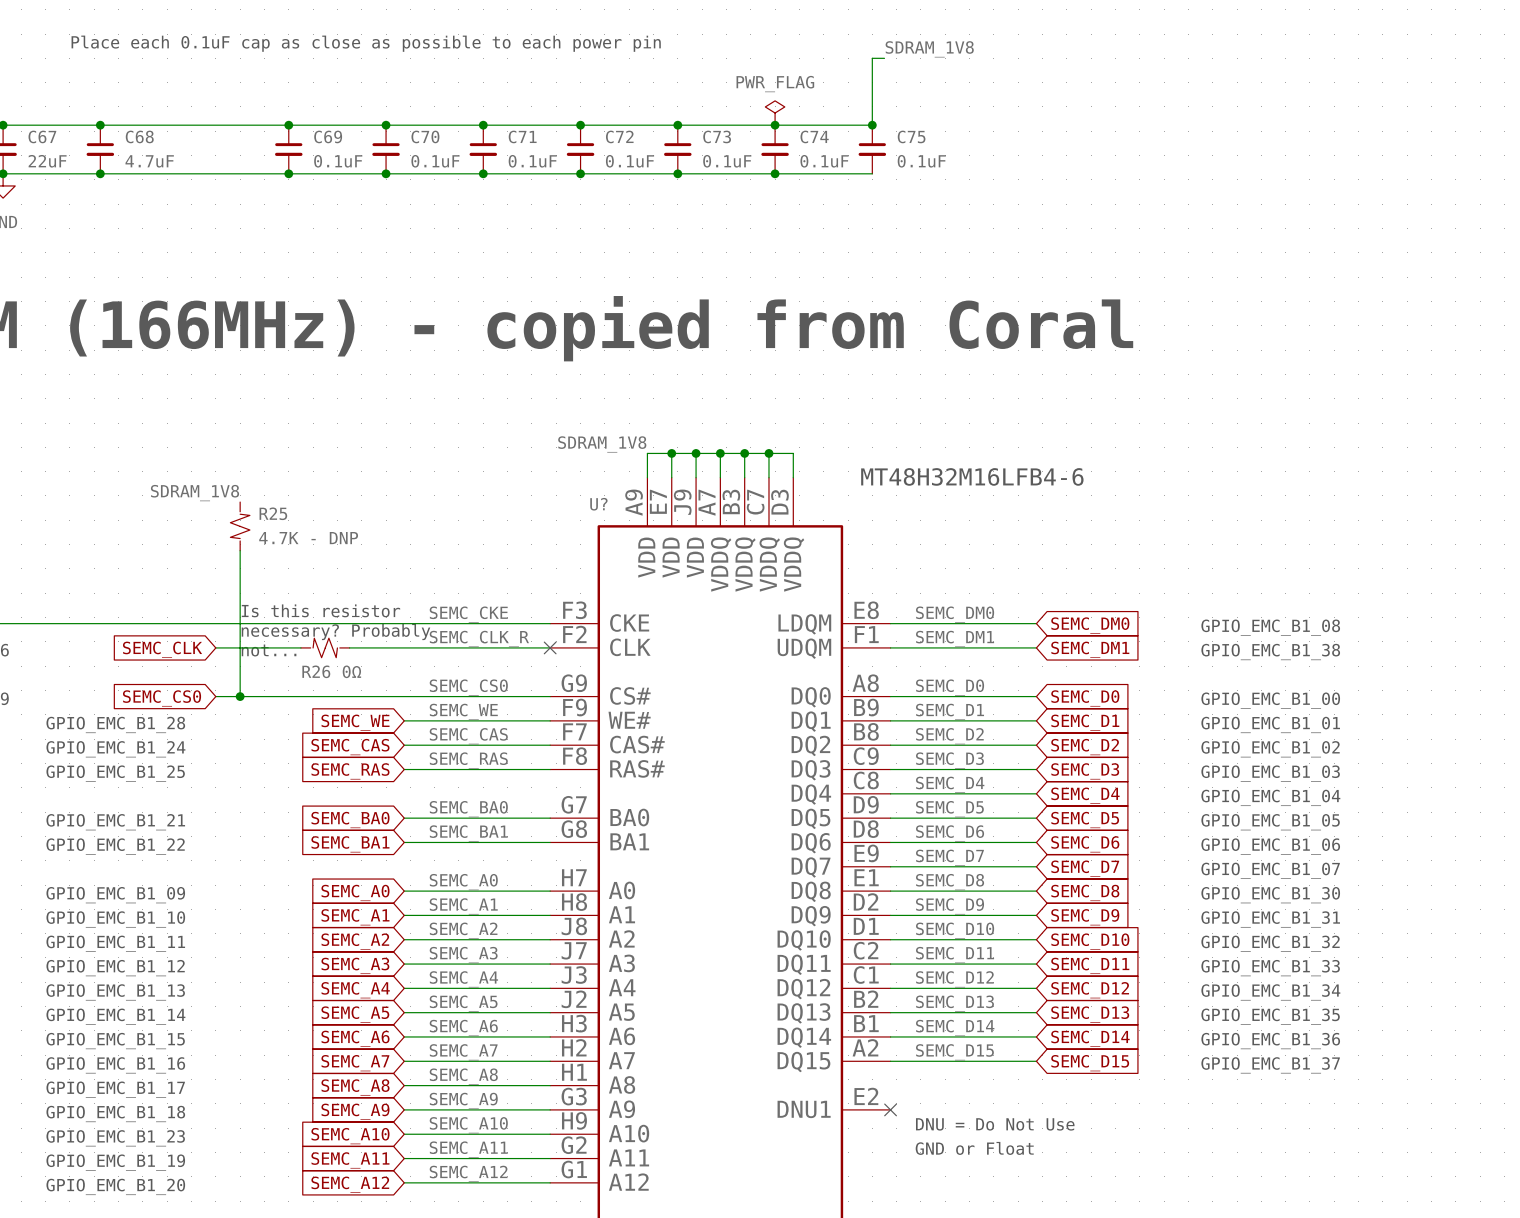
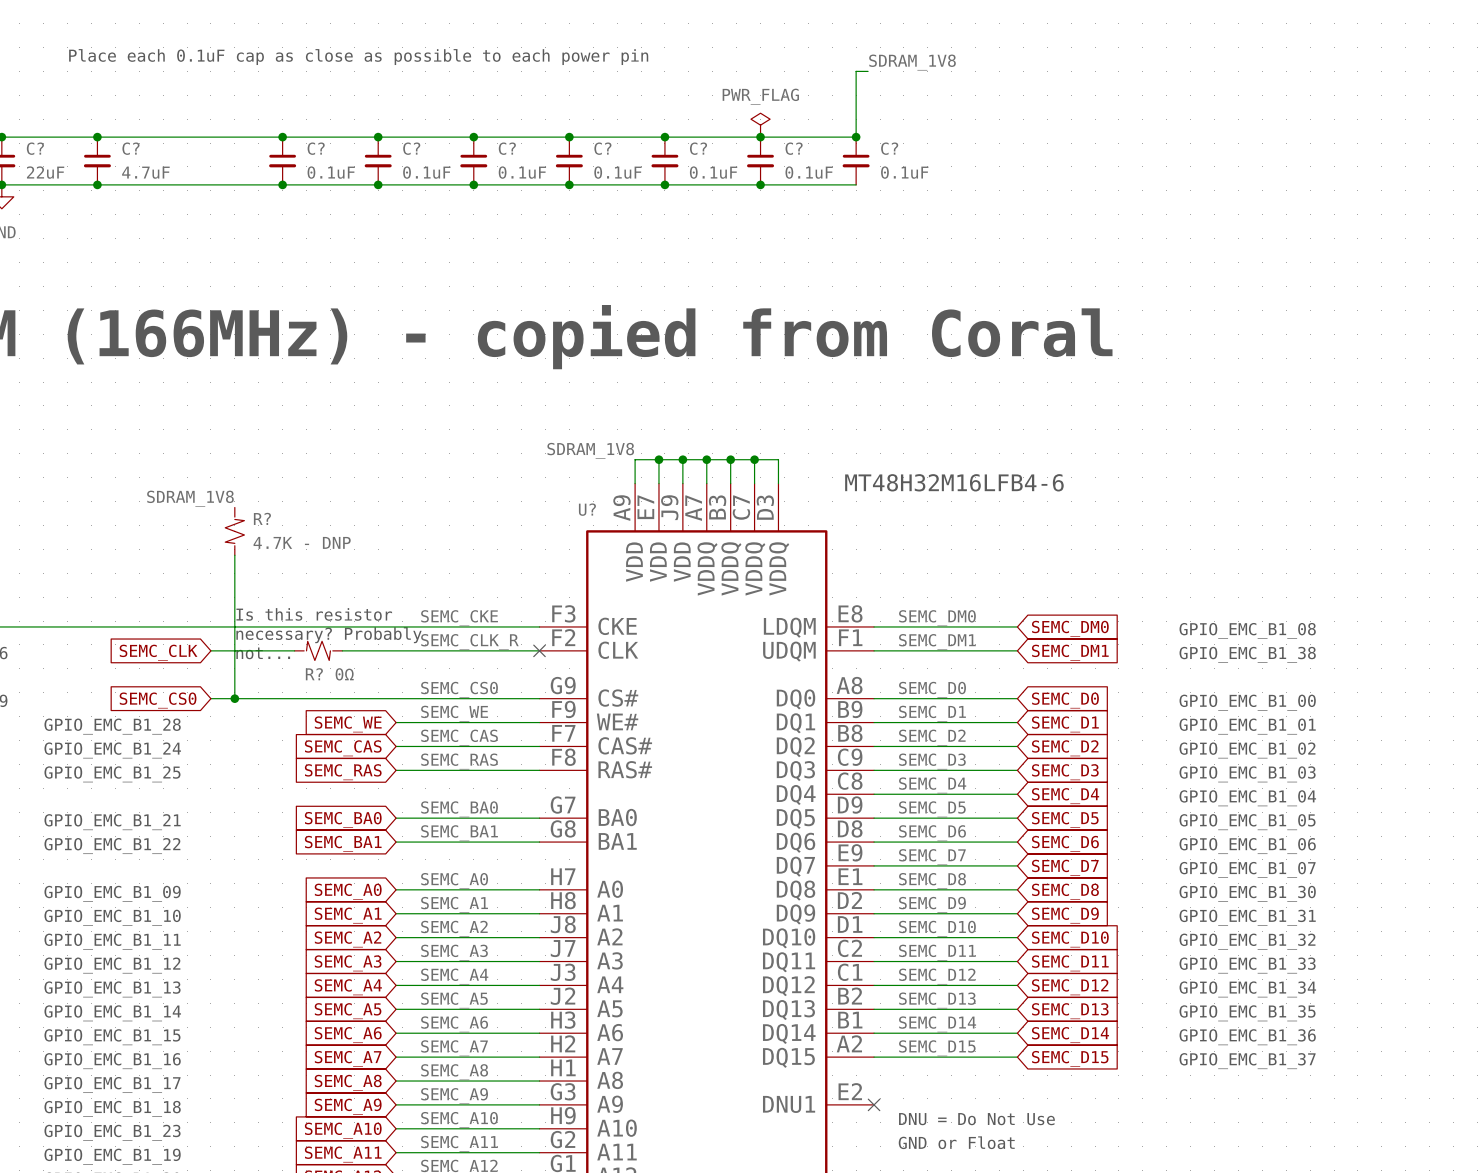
C67 name: C67 (42, 136) -> C? (35, 148)
C68 name: C68 (139, 136) -> C? (130, 148)
C69 name: C69 (328, 136) -> C? (316, 148)
C70 name: C70 (425, 136) -> C? (411, 148)
C71 name: C71 (522, 136) -> C? (507, 148)
C72 name: C72 (619, 136) -> C? (602, 148)
C73 name: C73 (717, 136) -> C? (698, 148)
C74 name: C74 (814, 136) -> C? (794, 148)
C75 name: C75 (911, 136) -> C? (889, 148)
R25 name: R25 (273, 513) -> R? (262, 518)
R26 name: R26 (316, 671) -> R? (314, 674)

